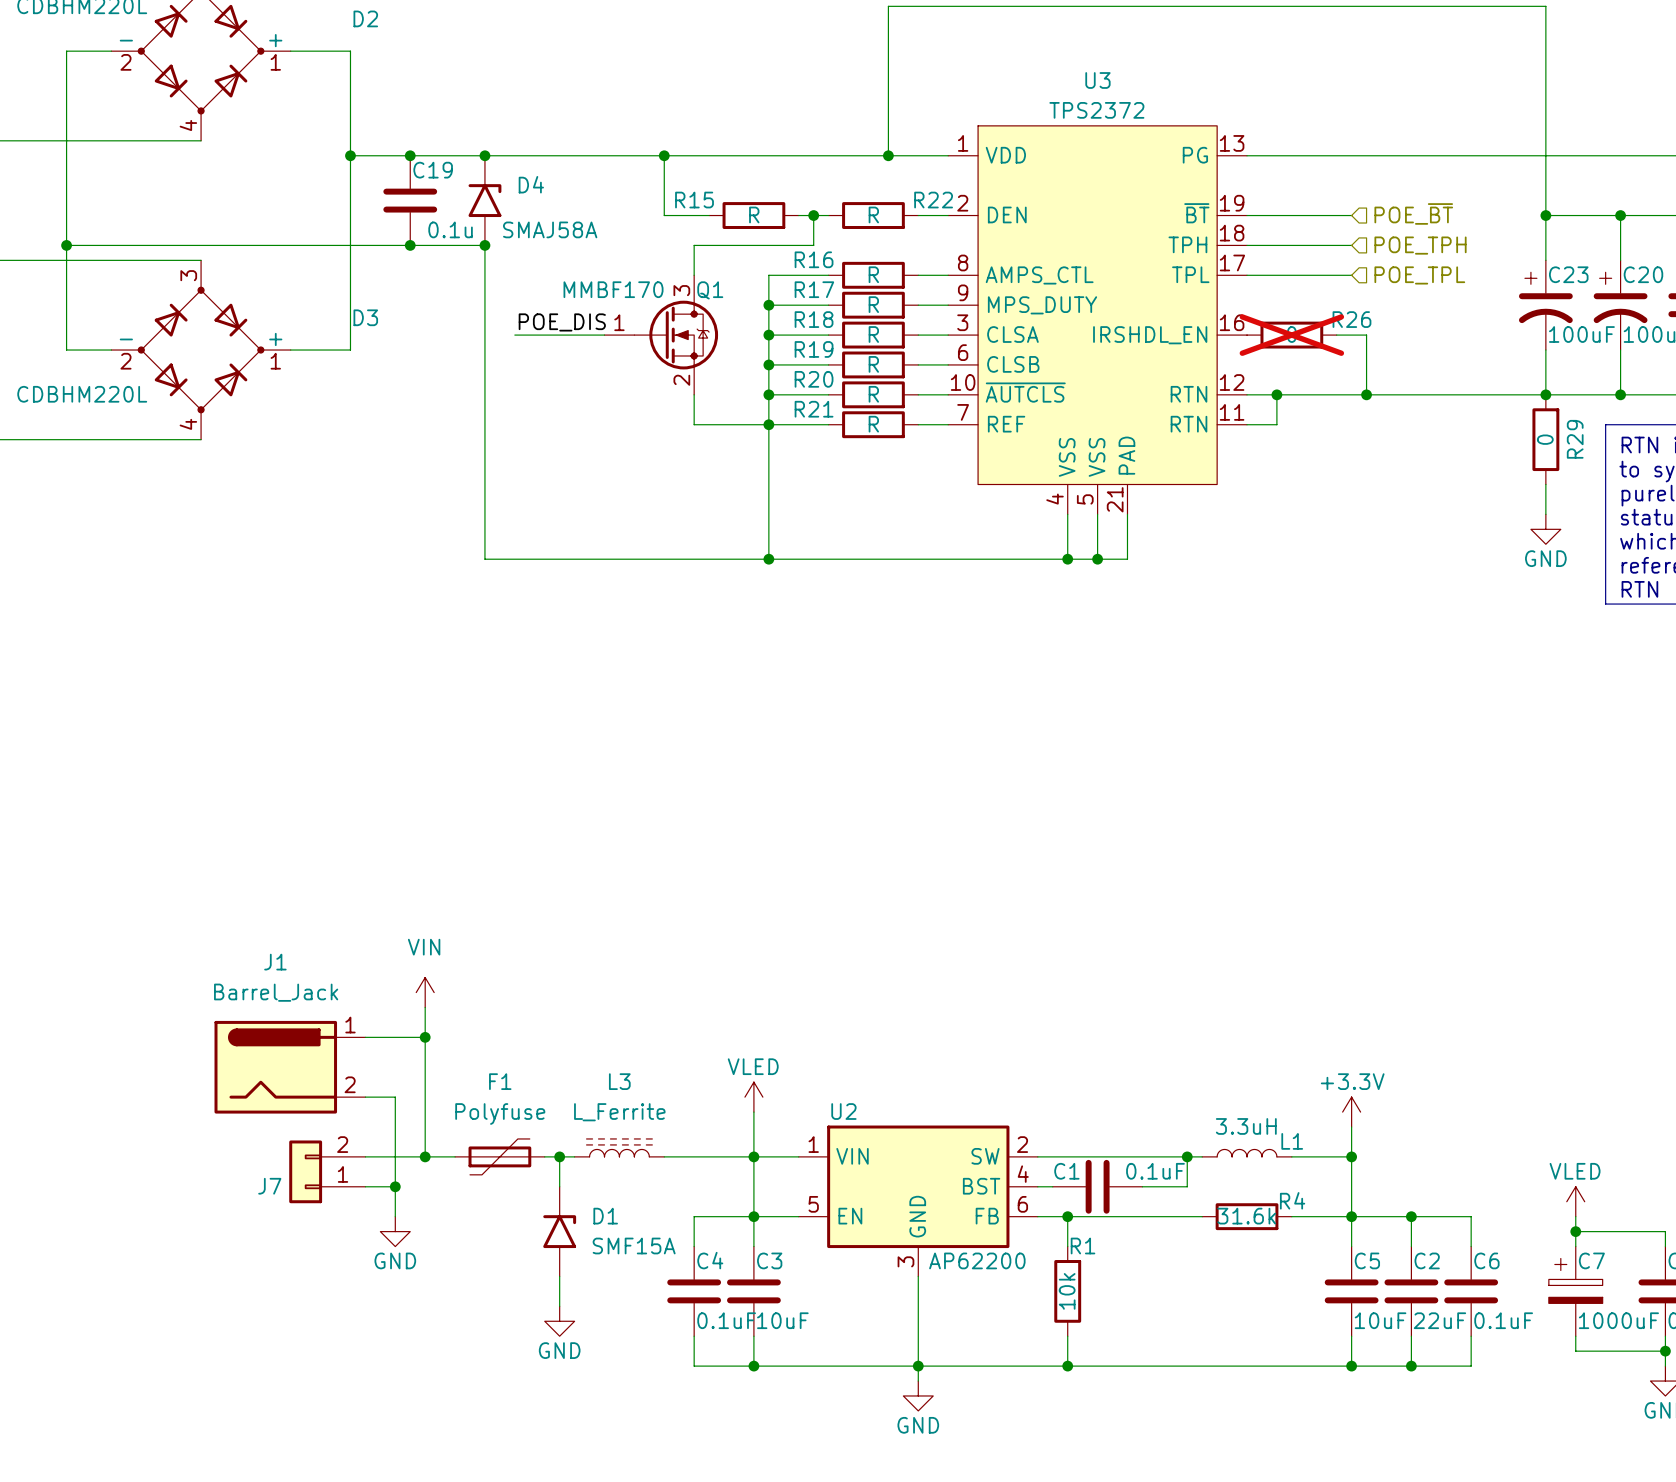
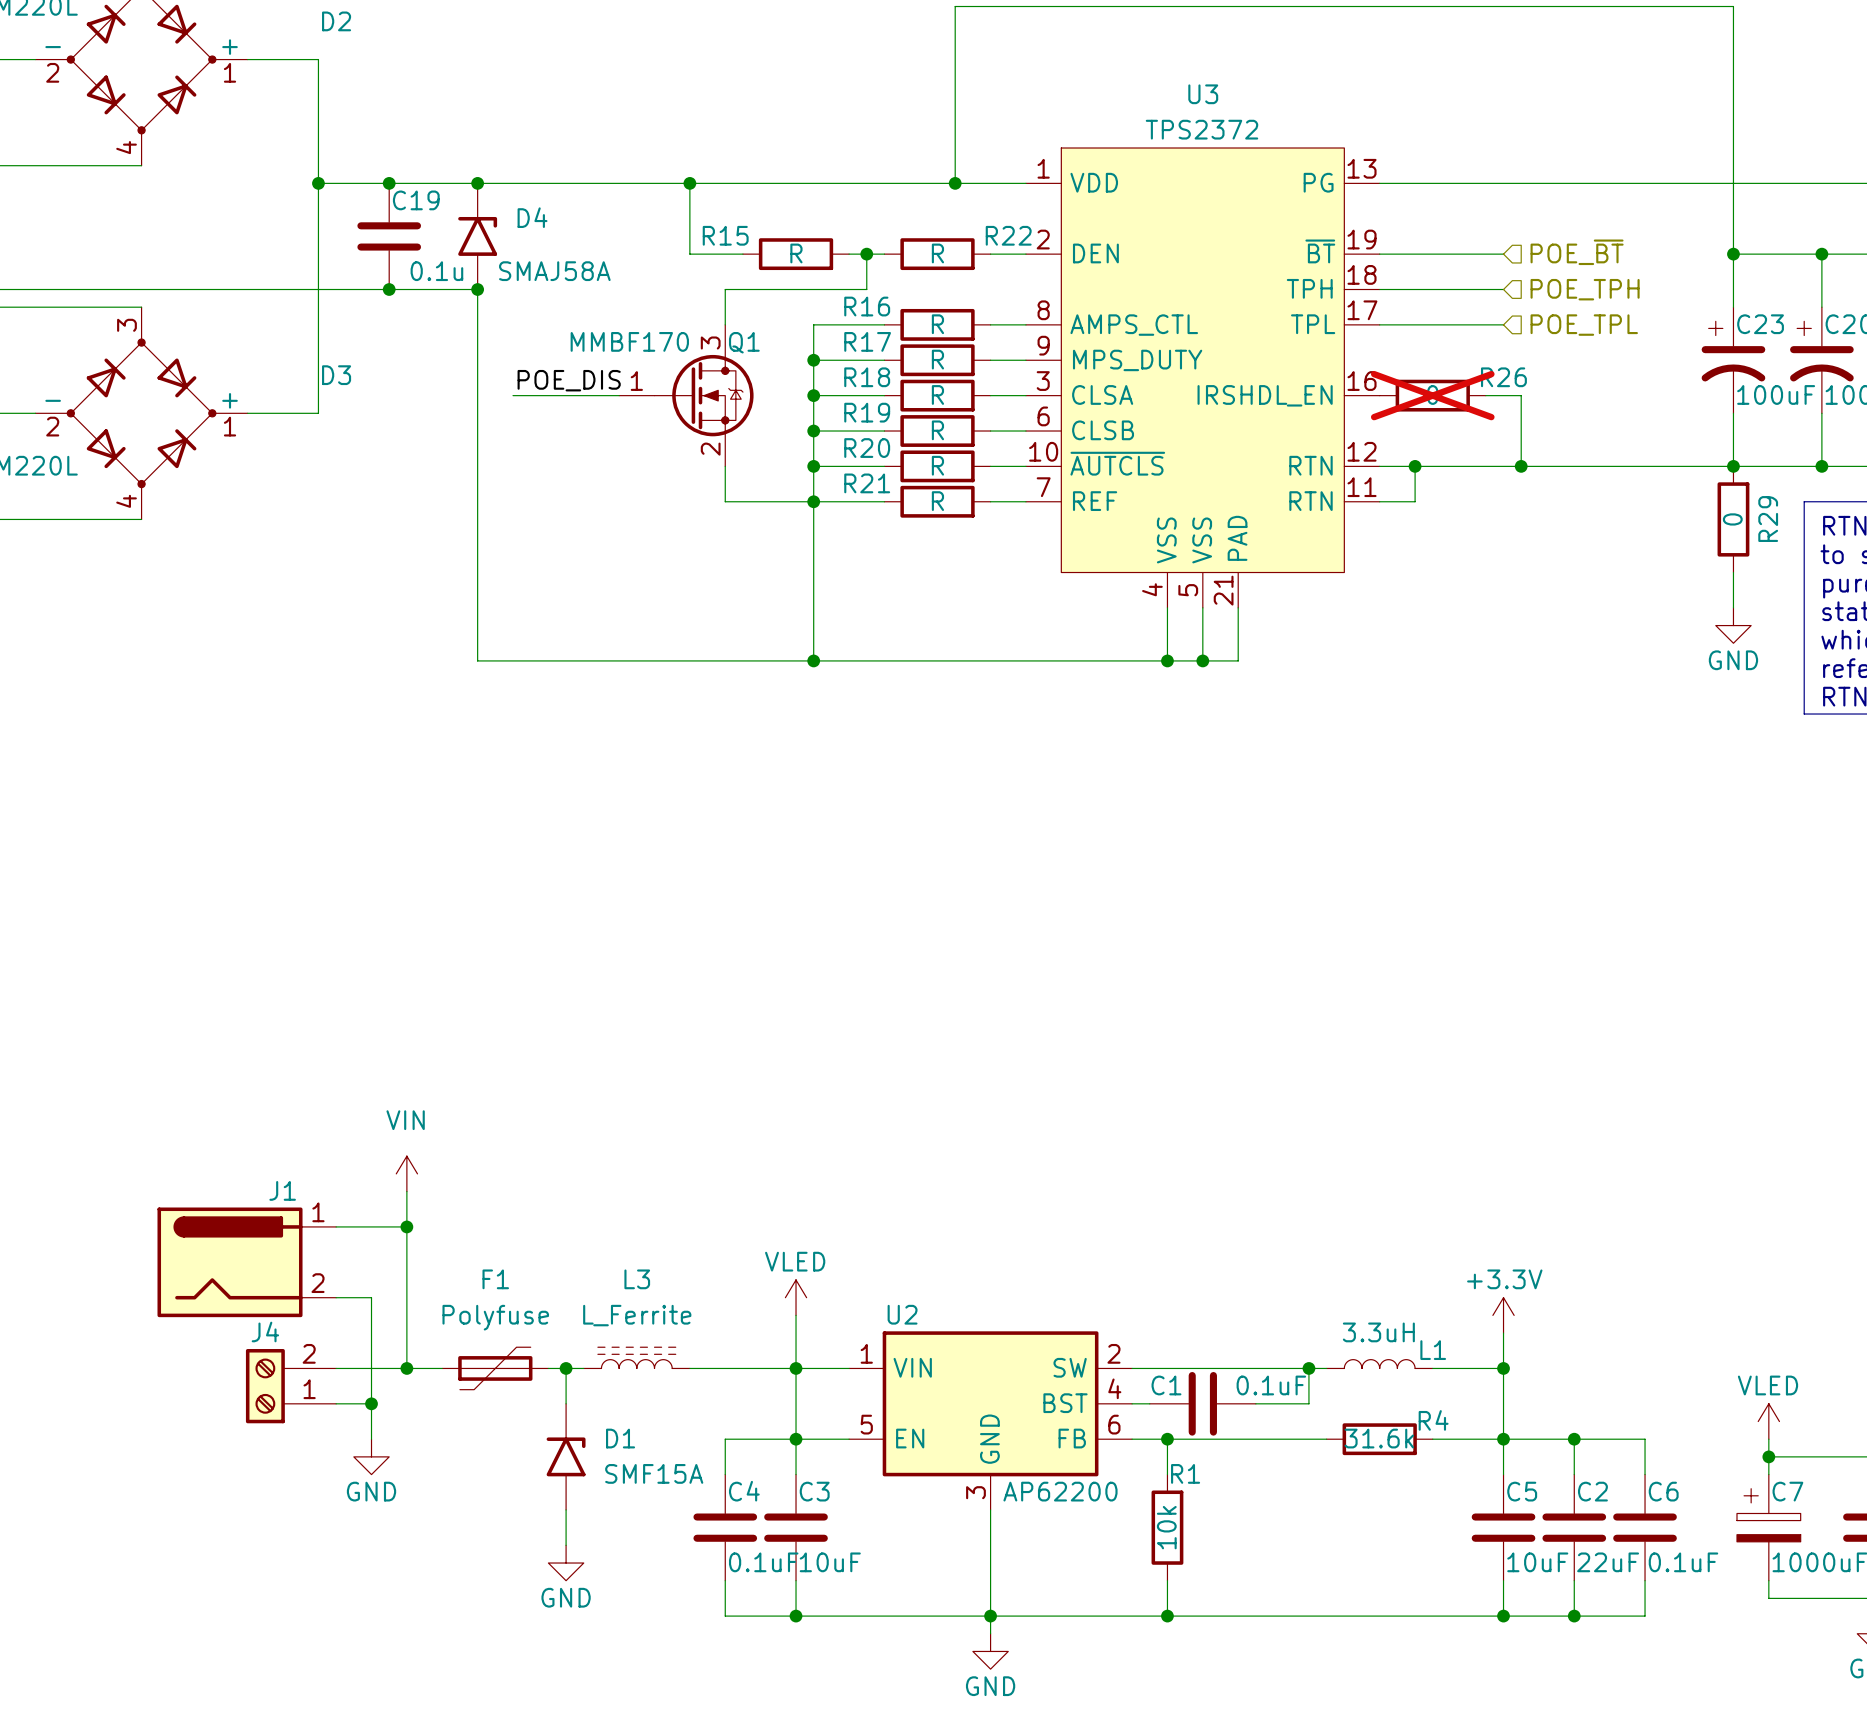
J1 name position: J1 (275, 962) -> J1 (282, 1190)
J1 value: Barrel_Jack (276, 992) -> none
J7: (327, 1171) -> none
J4: none -> (291, 1386)

